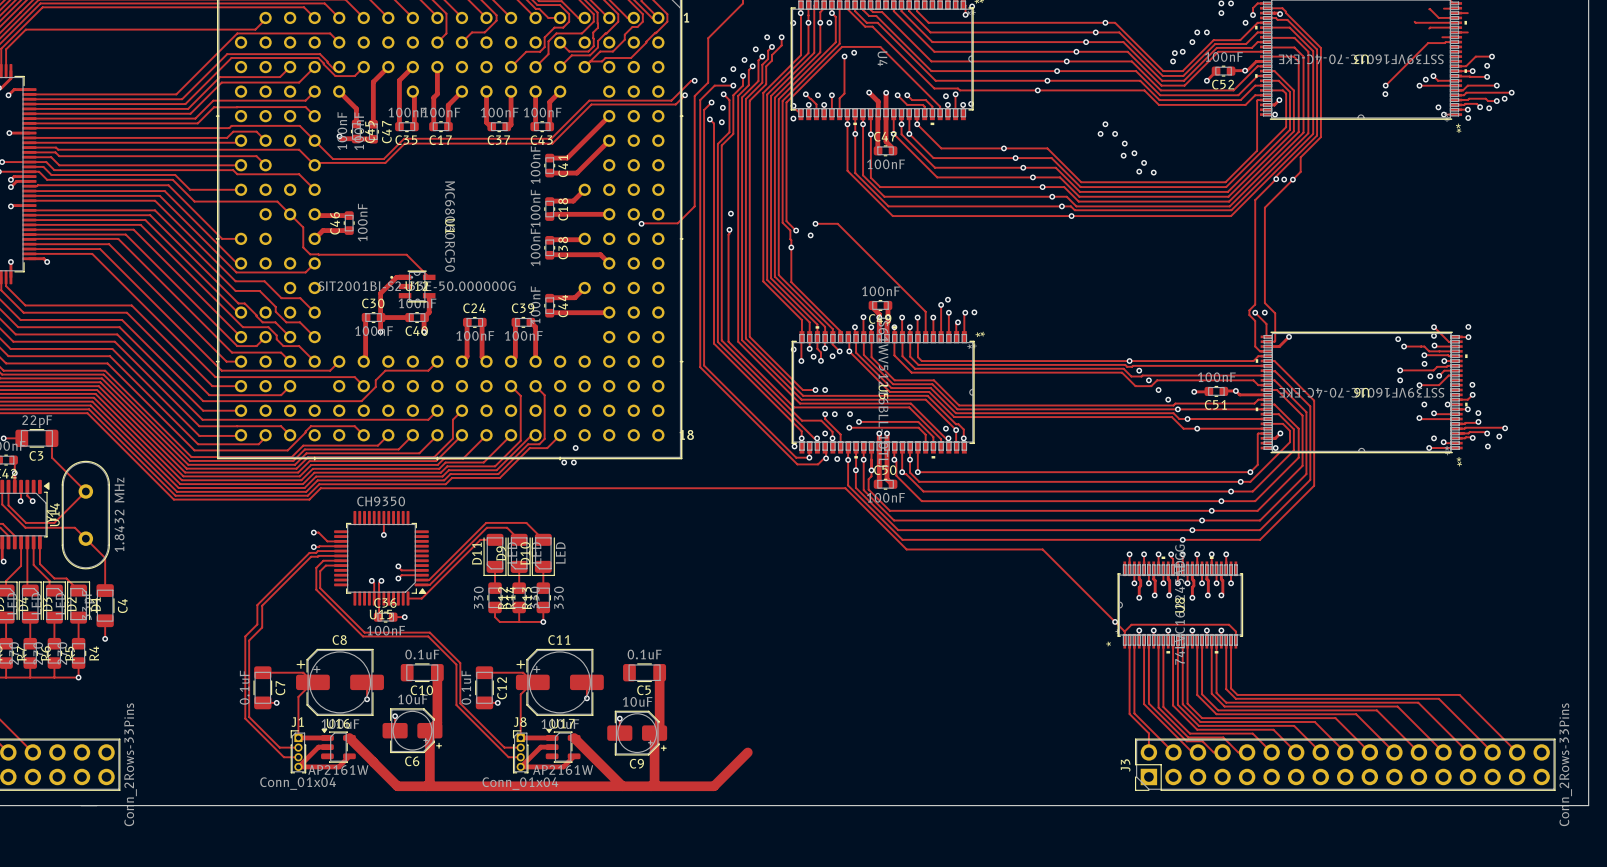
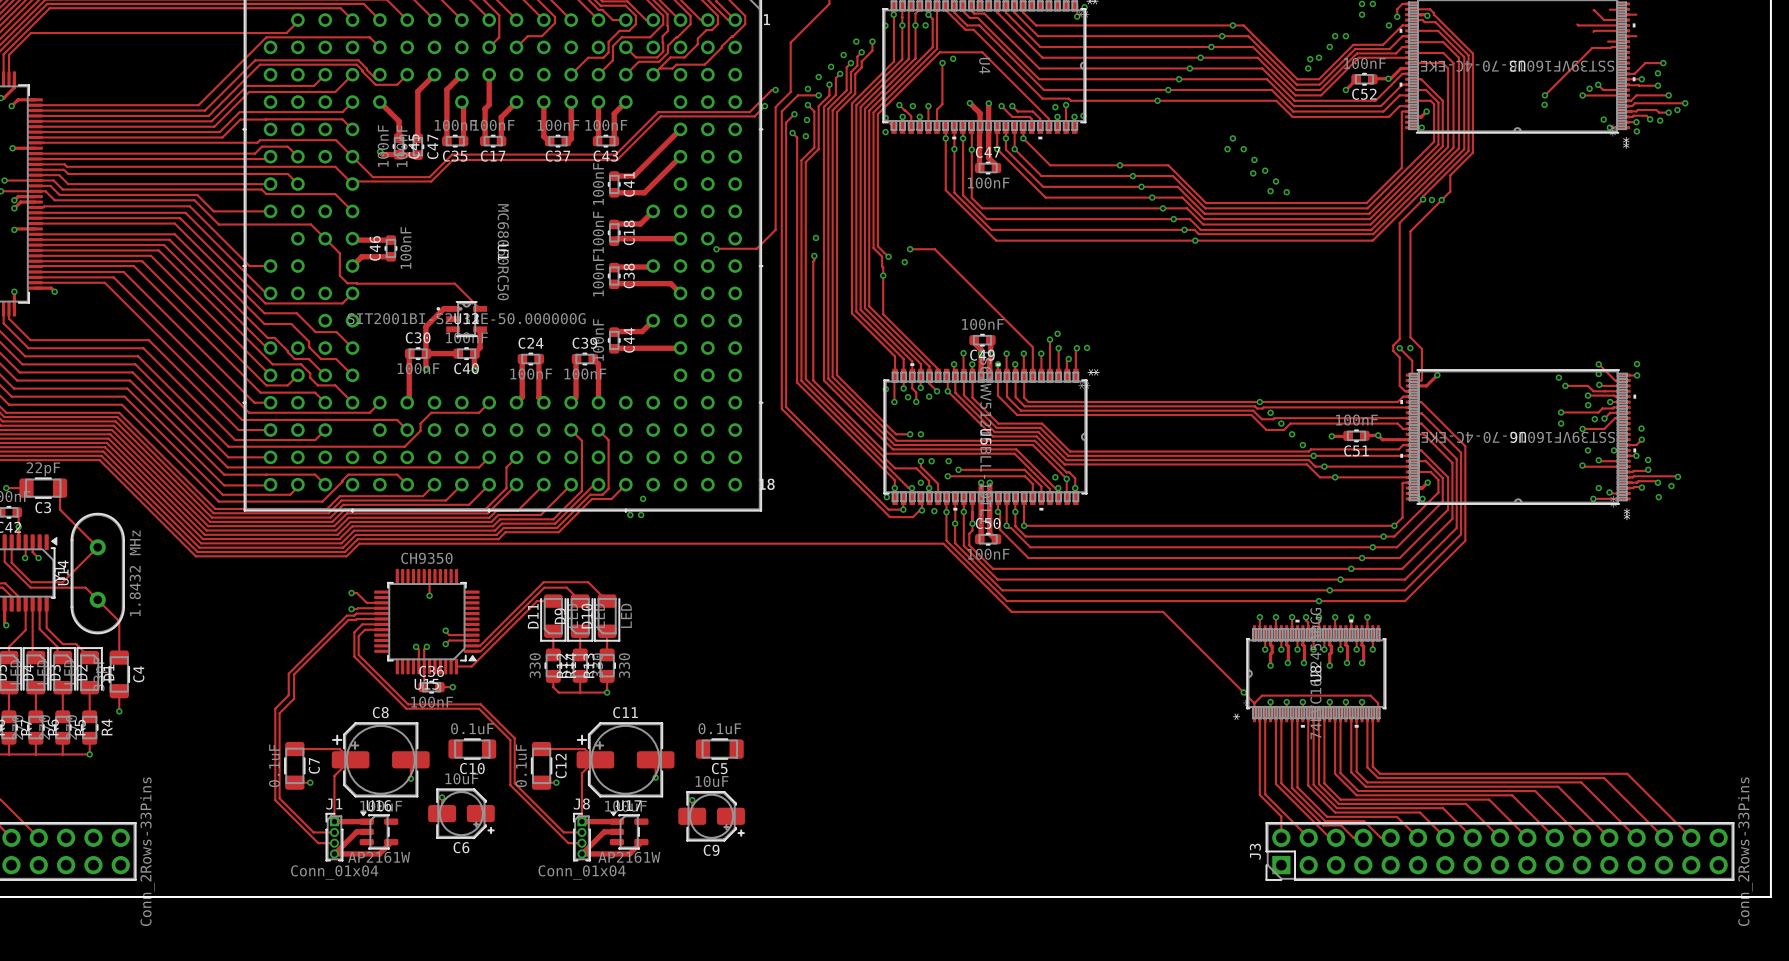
track: (437, 672) (437, 723) (429, 730) (429, 782) (426, 786) -> none
track: (659, 672) (659, 728) (654, 733) (654, 782) (651, 786) -> none
track: (349, 737) (397, 786) (714, 786) (747, 752) -> none
track: (574, 737) (622, 786) -> none

